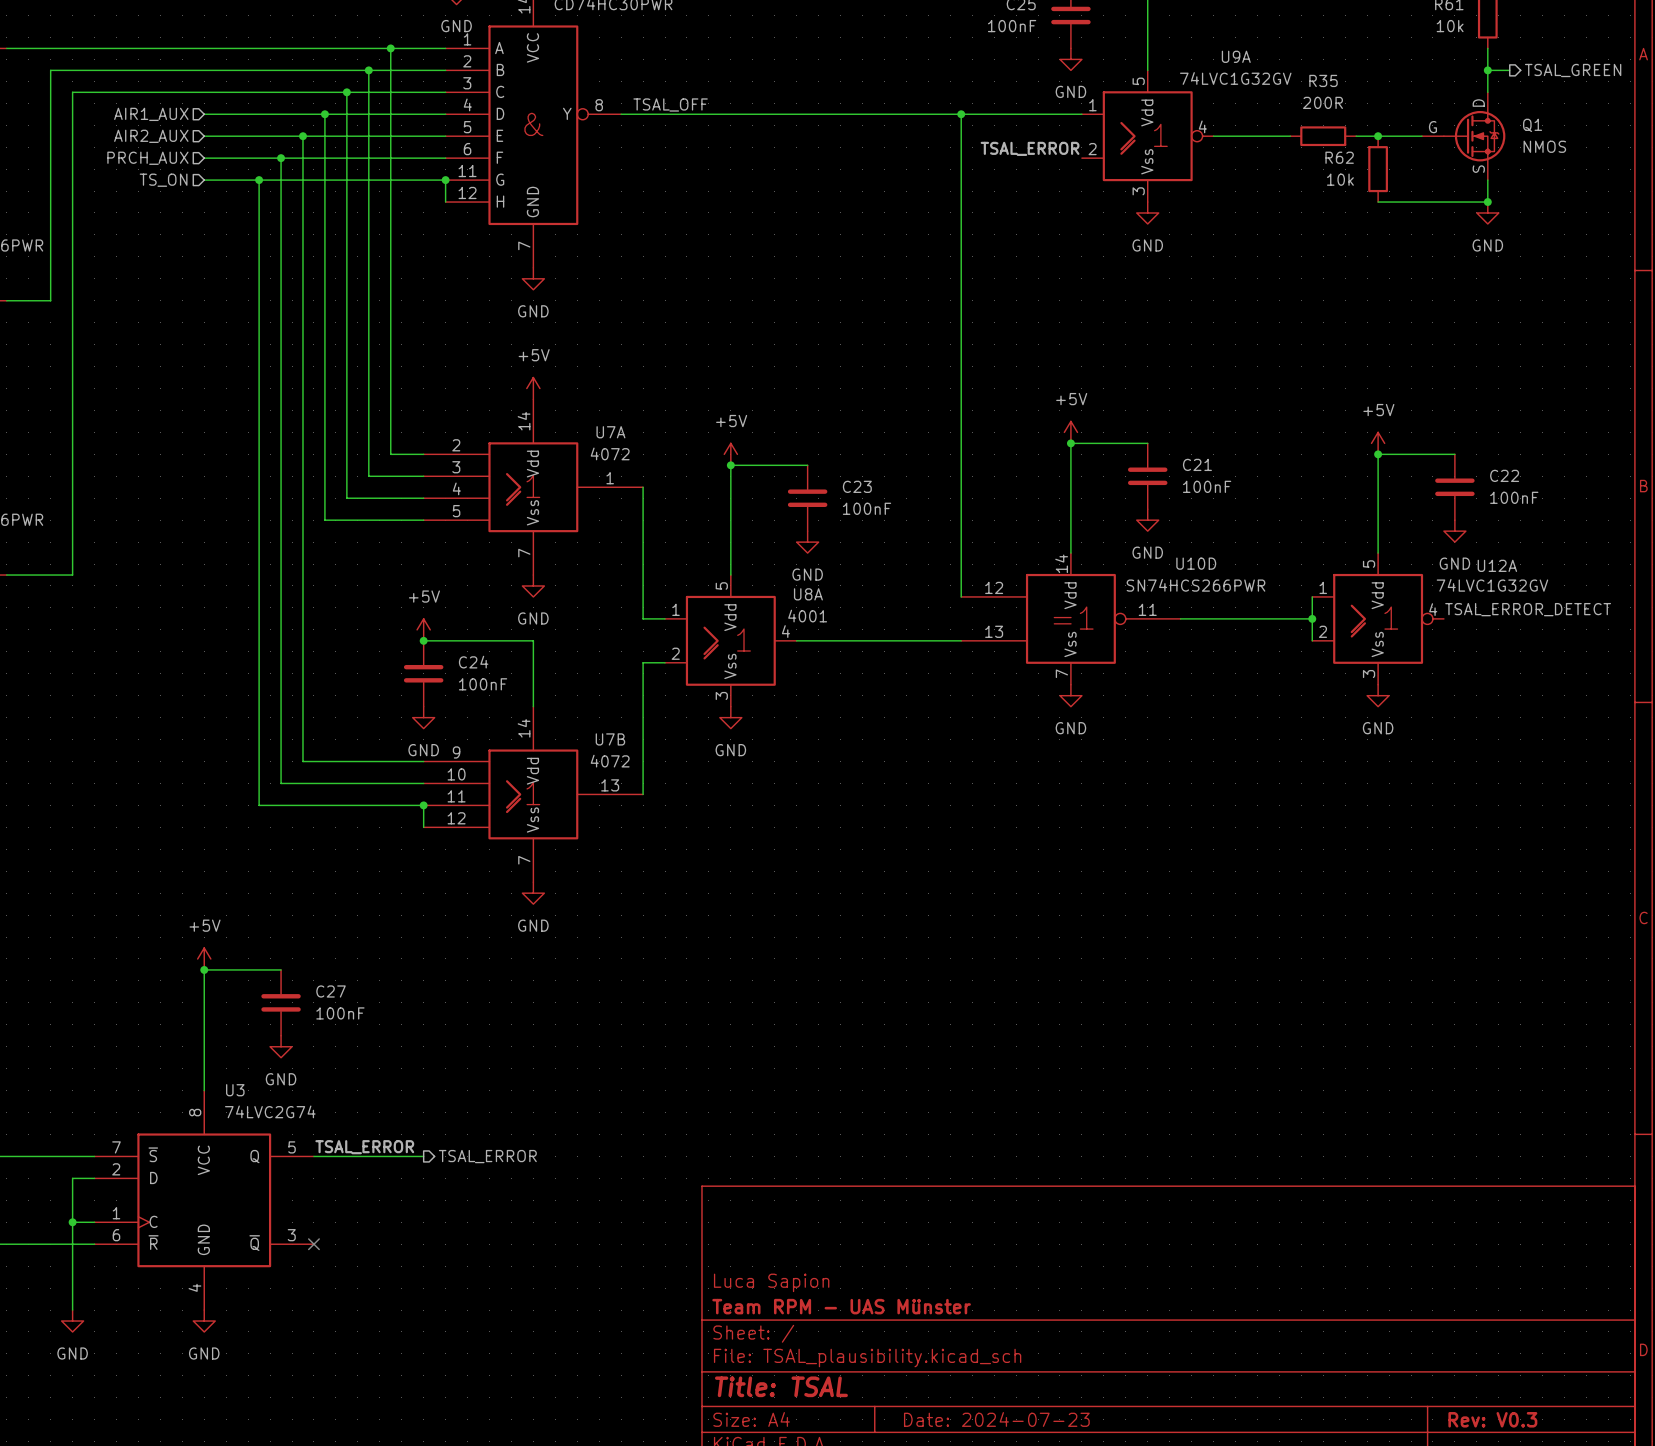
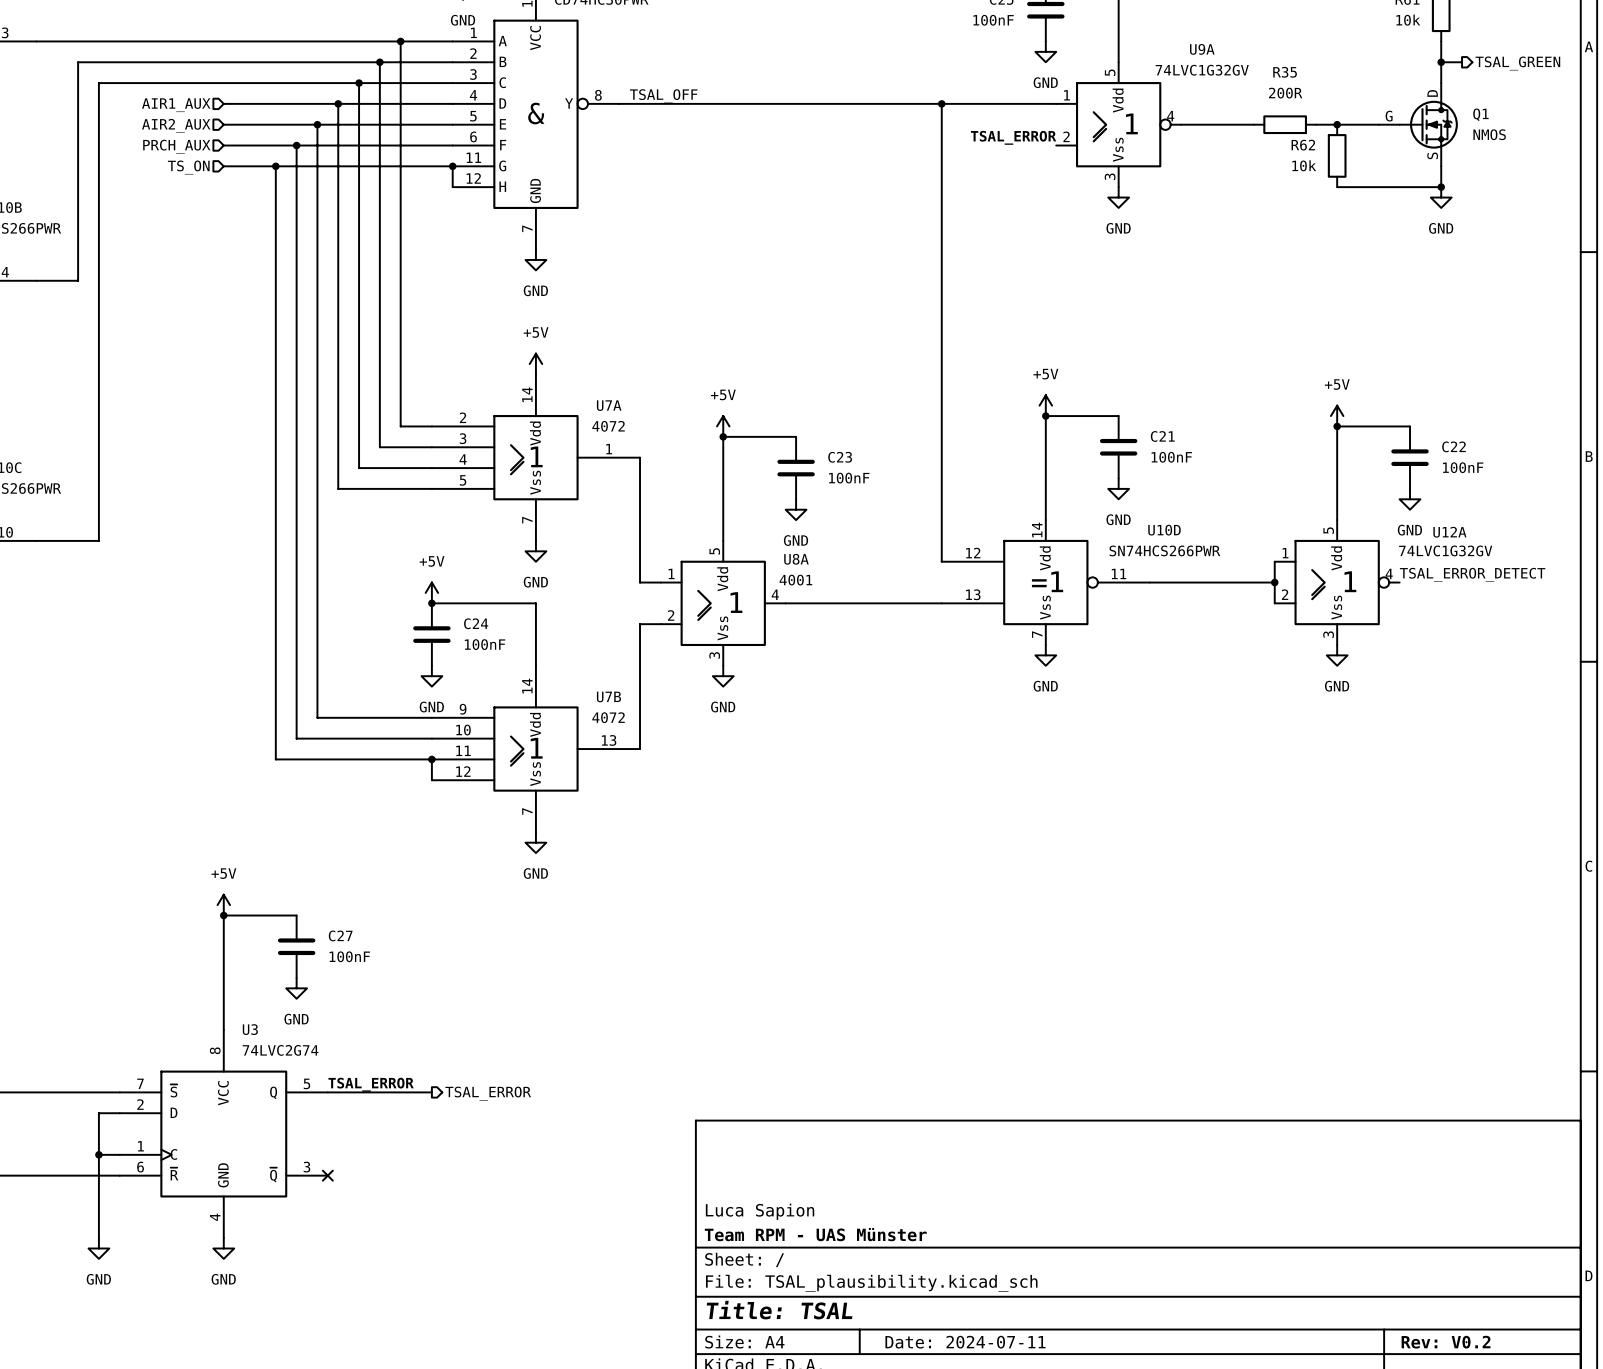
title block: Date: 2024-07-23 (996, 1419) -> Date: 2024-07-11 (965, 1342)
title block: Rev: V0.3 (1492, 1419) -> Rev: V0.2 (1446, 1342)

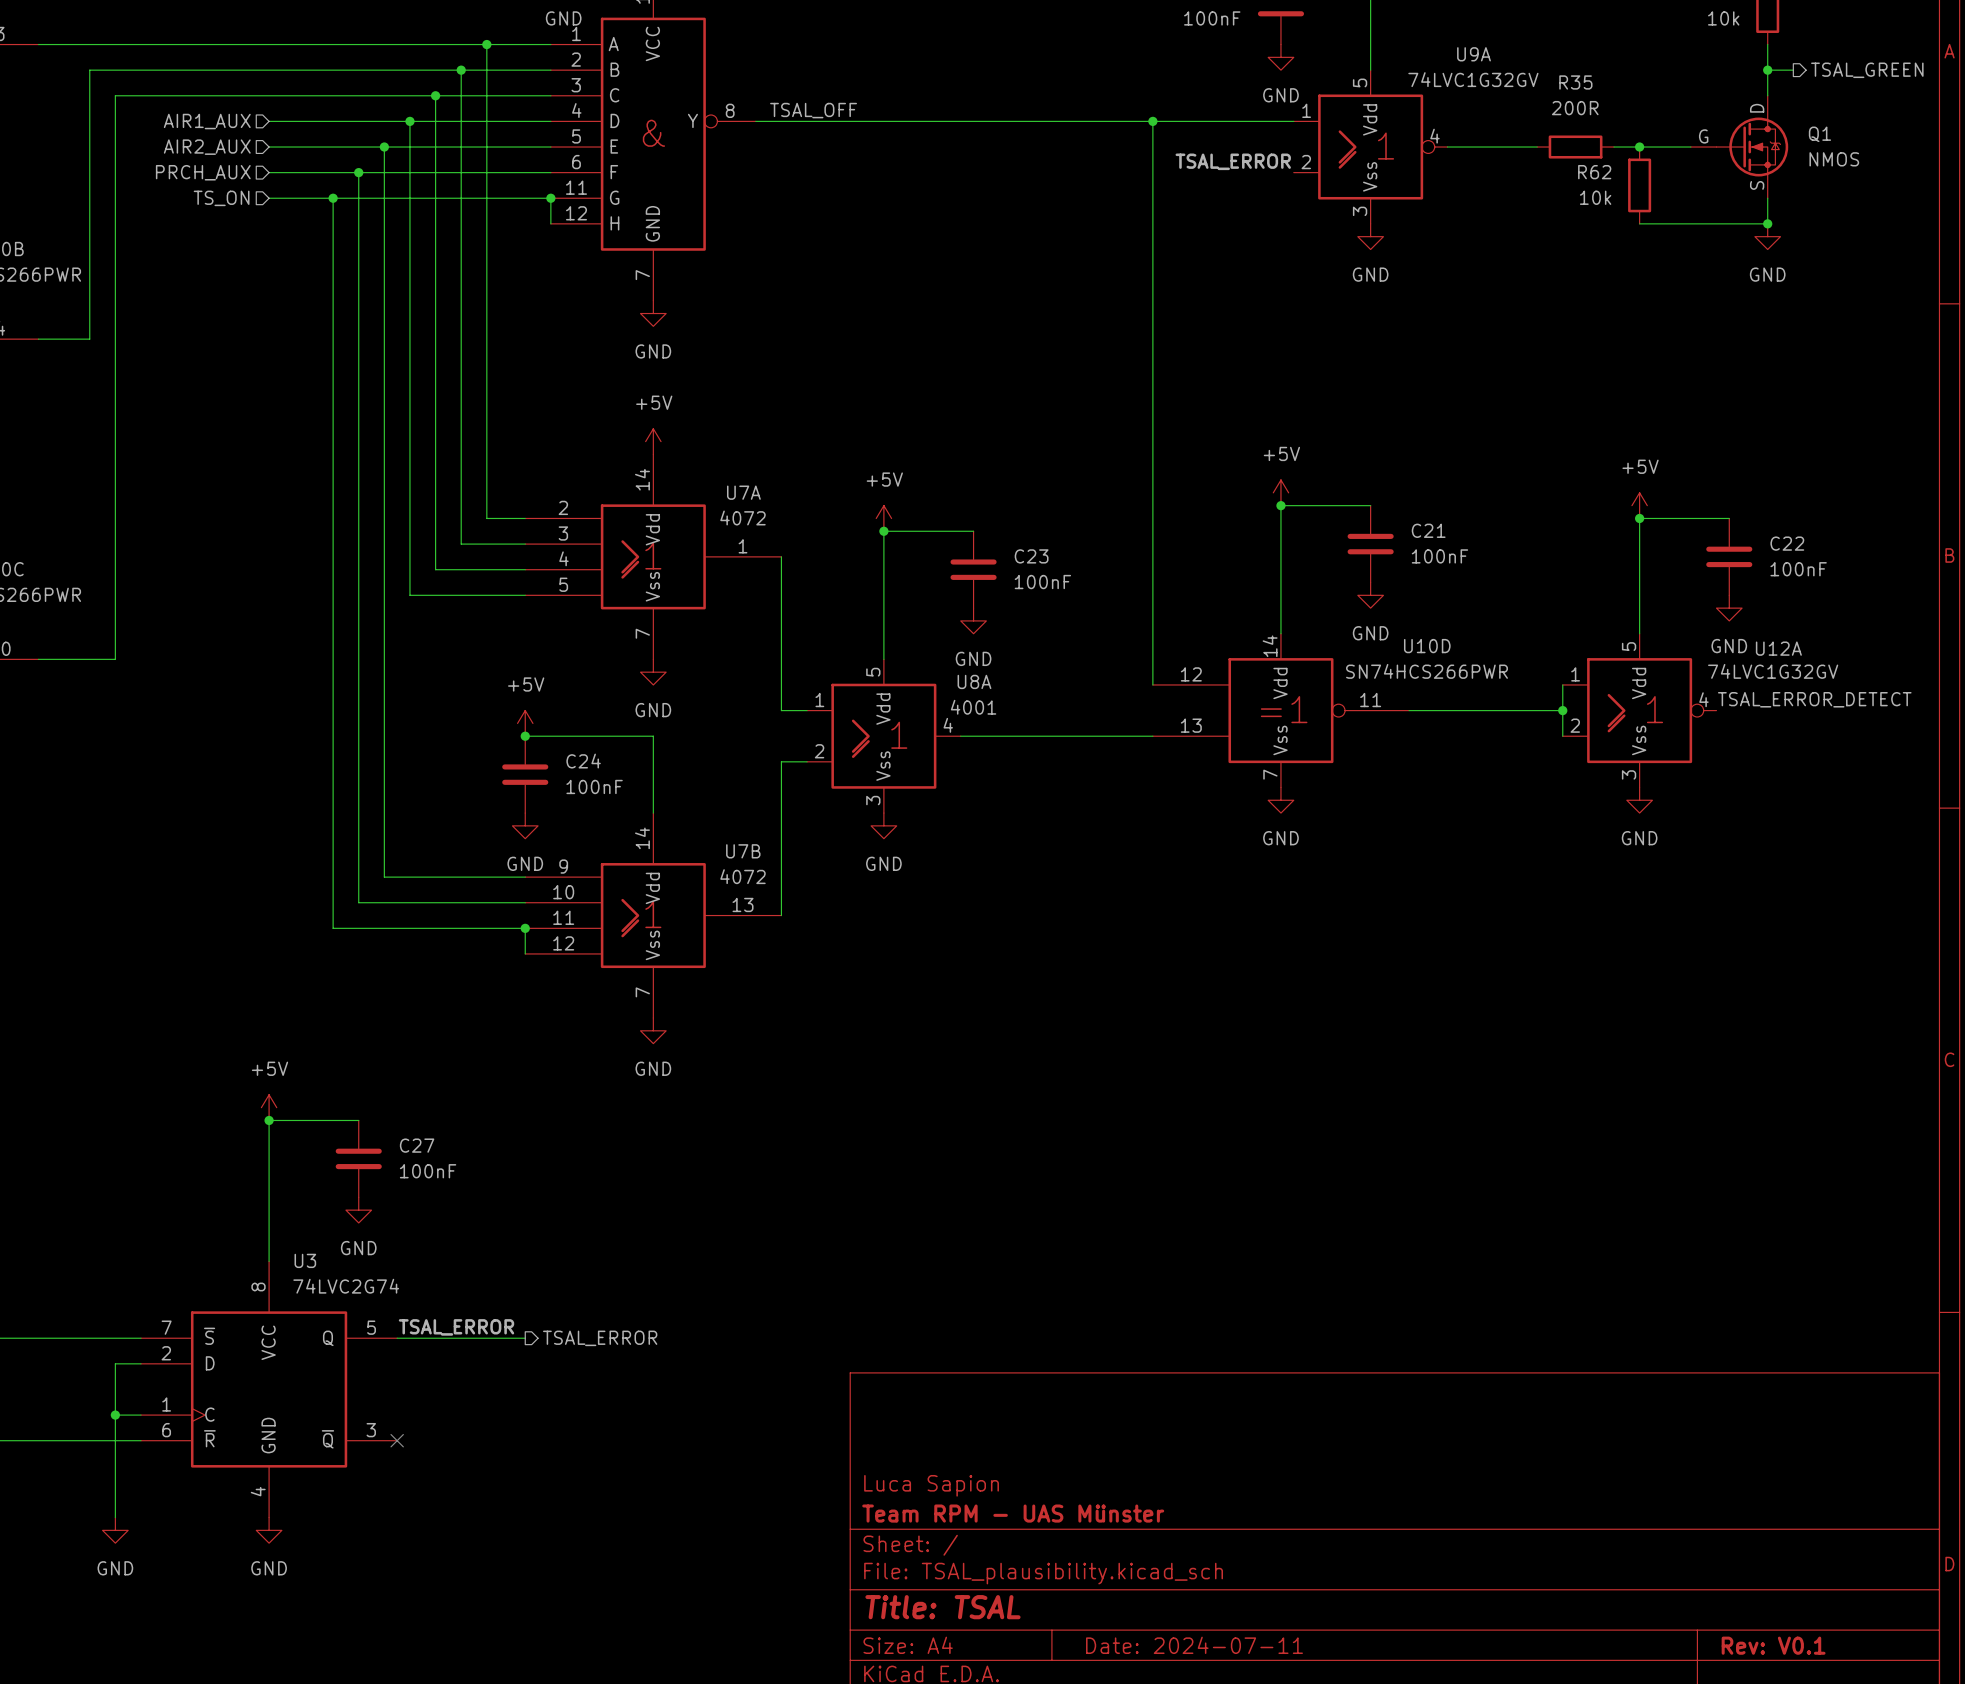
title block: Rev: V0.2 (1446, 1342) -> Rev: V0.1 (1773, 1645)

